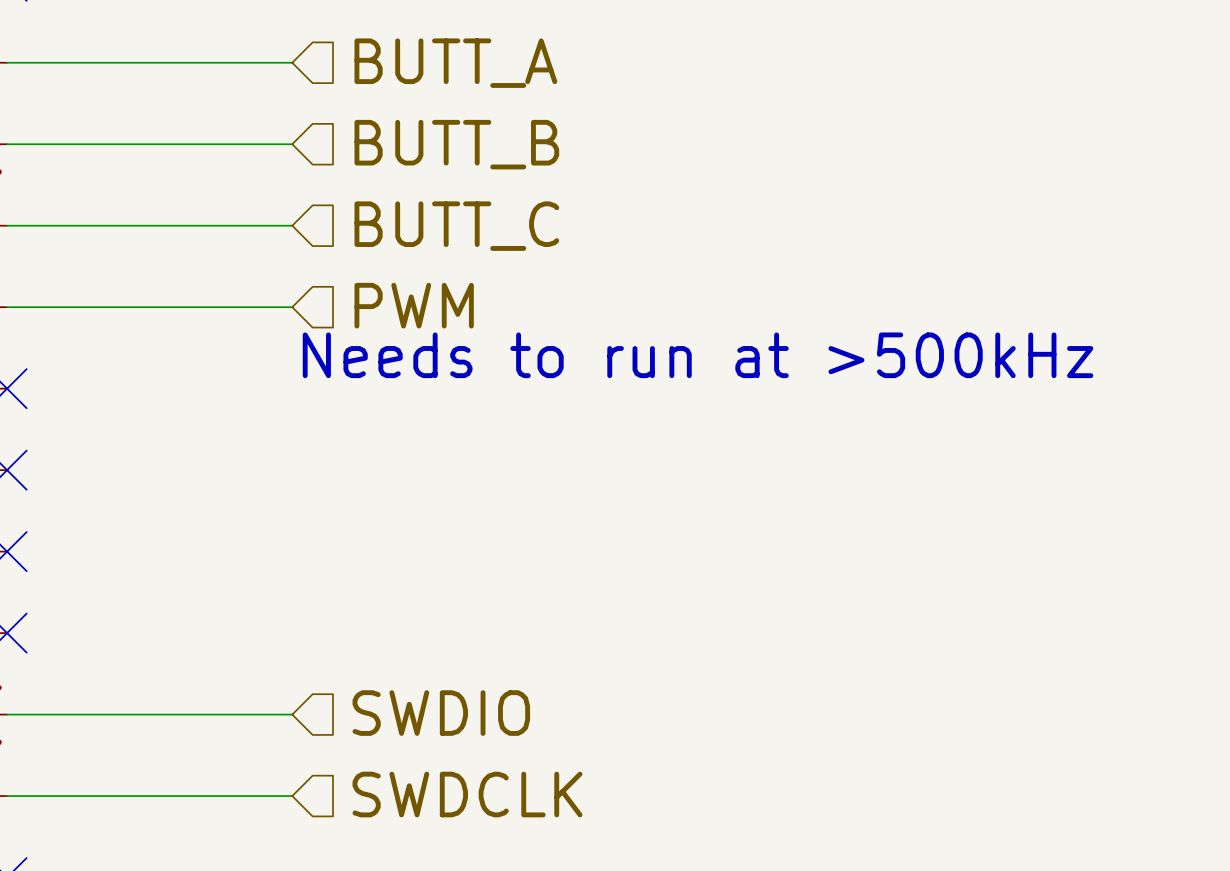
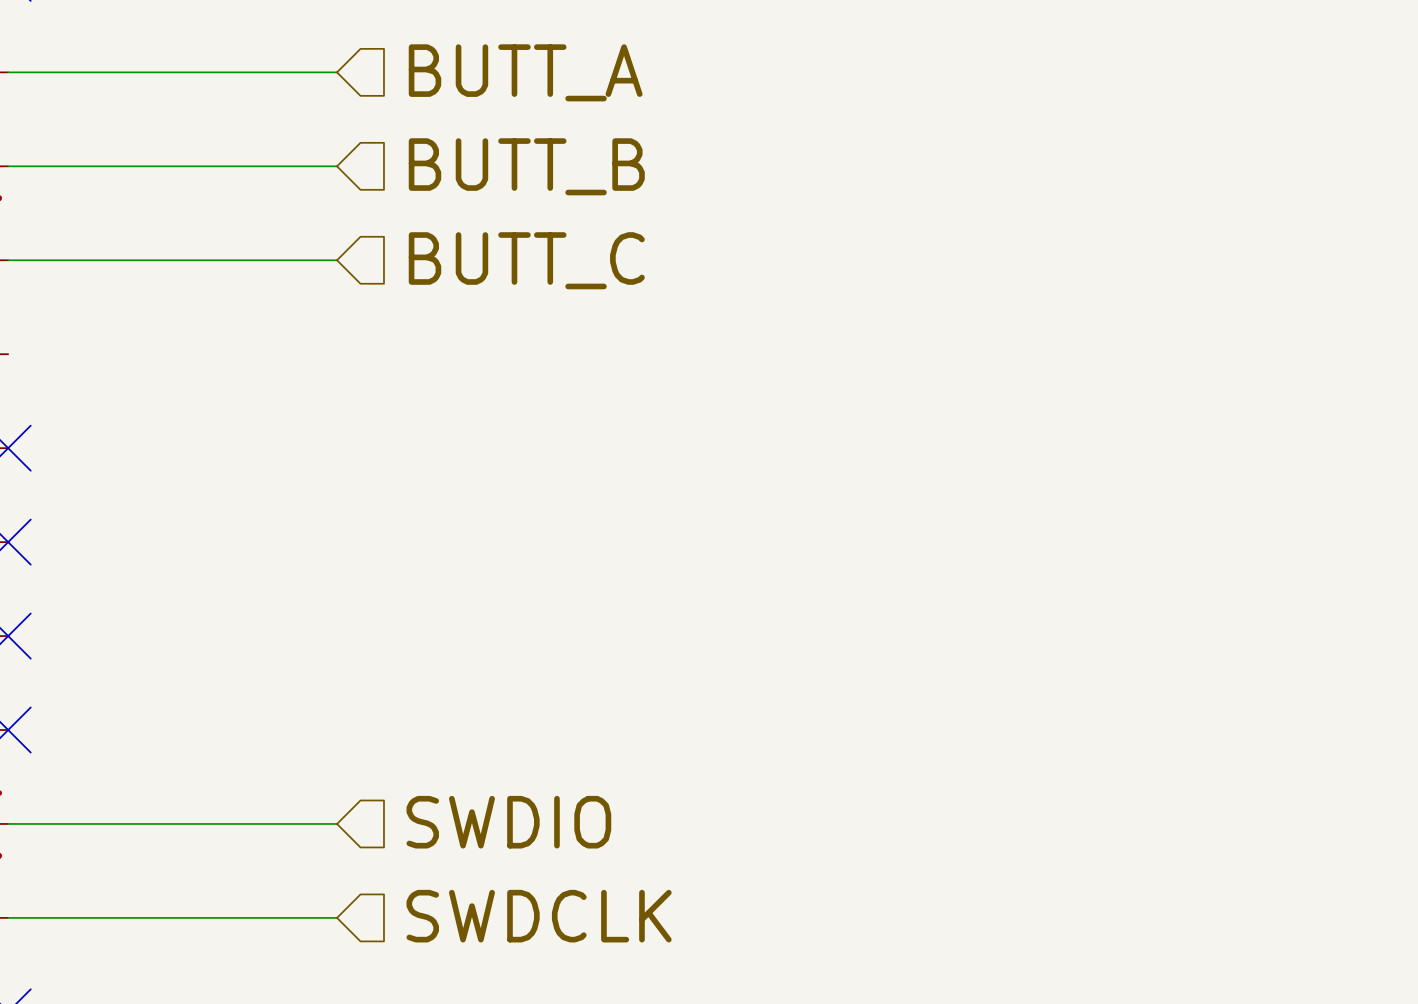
hierarchical label: PWM (414, 305) -> none
wire: (7, 307) (292, 307) -> none
text: Needs to run at >500kHz (698, 355) -> none

